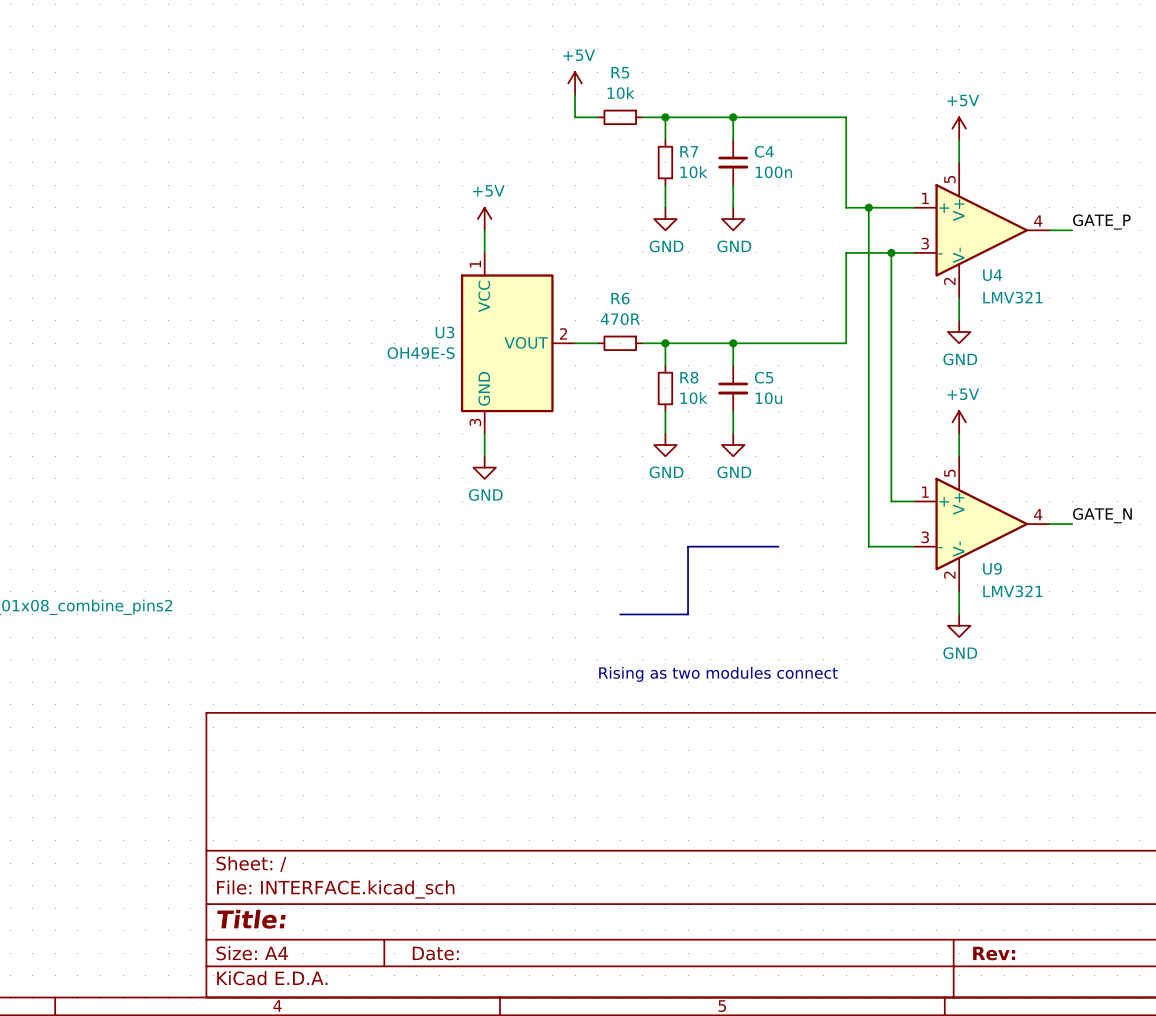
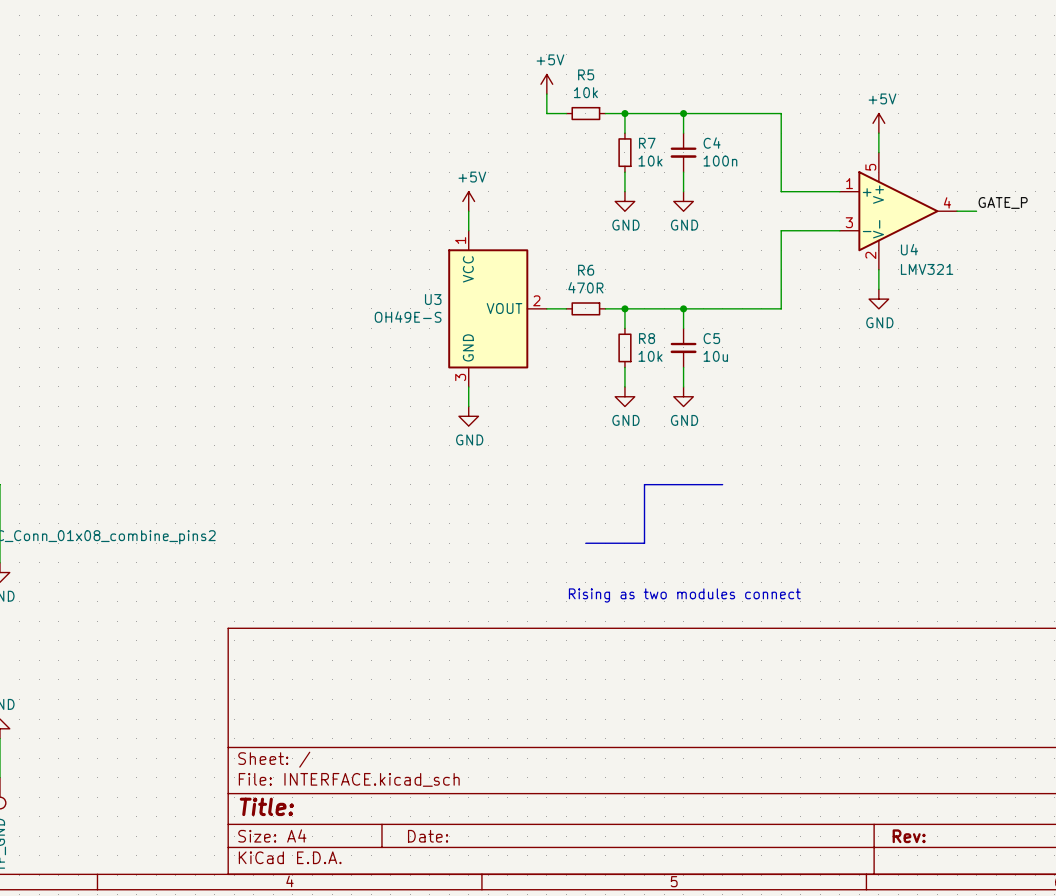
wire: (868, 207) (868, 546) (913, 546) -> none
junction: (868, 207) -> none
wire: (891, 252) (891, 501) (913, 501) -> none
junction: (891, 252) -> none
power symbol: +5V (959, 422) -> none
wire: (959, 433) (959, 456) -> none
label: GATE_N (1102, 515) -> none
U9: LMV321 (981, 524) -> none
wire: (1049, 524) (1072, 524) -> none
wire: (959, 591) (959, 614) -> none
power symbol: GND (959, 625) -> none

